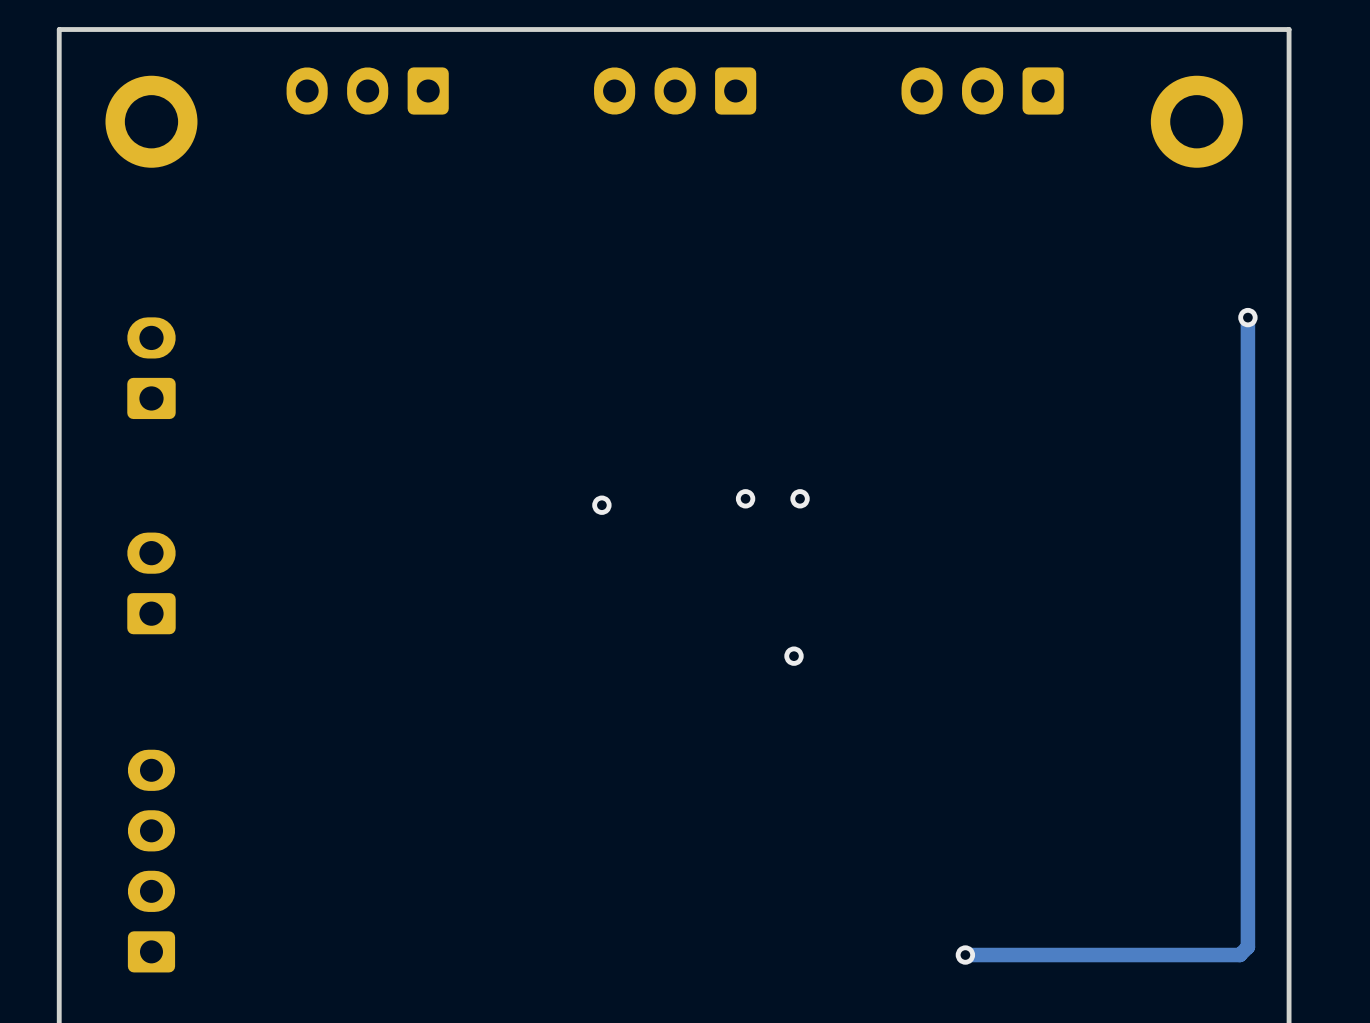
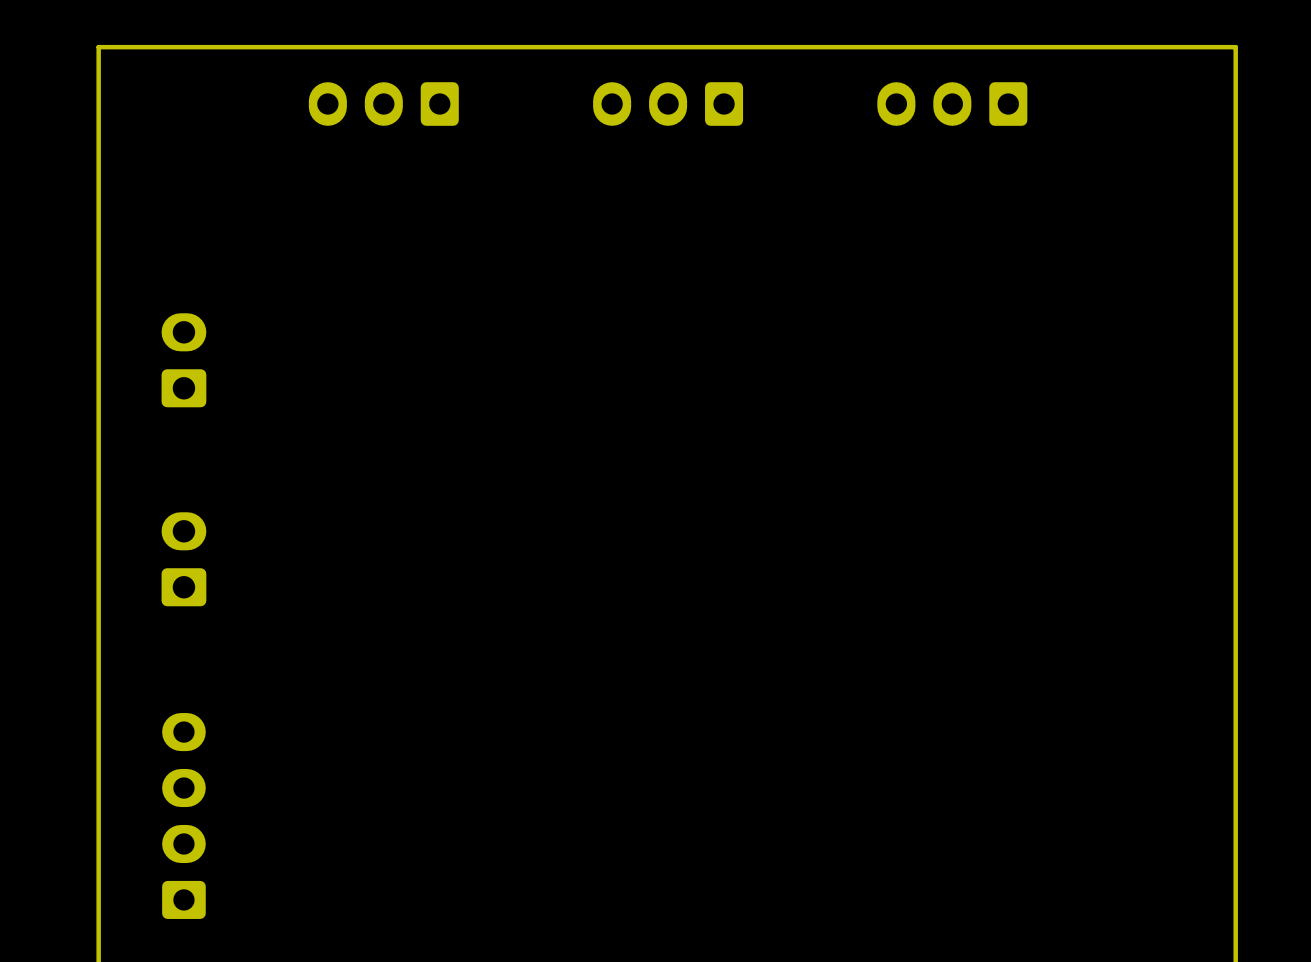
part: (151, 121) -> none
part: (1196, 121) -> none
track: (1247, 317) (1247, 947) (1239, 955) (965, 955) -> none
via: (1247, 317) -> none
via: (745, 498) -> none
via: (800, 498) -> none
via: (601, 505) -> none
via: (793, 656) -> none
via: (965, 955) -> none

